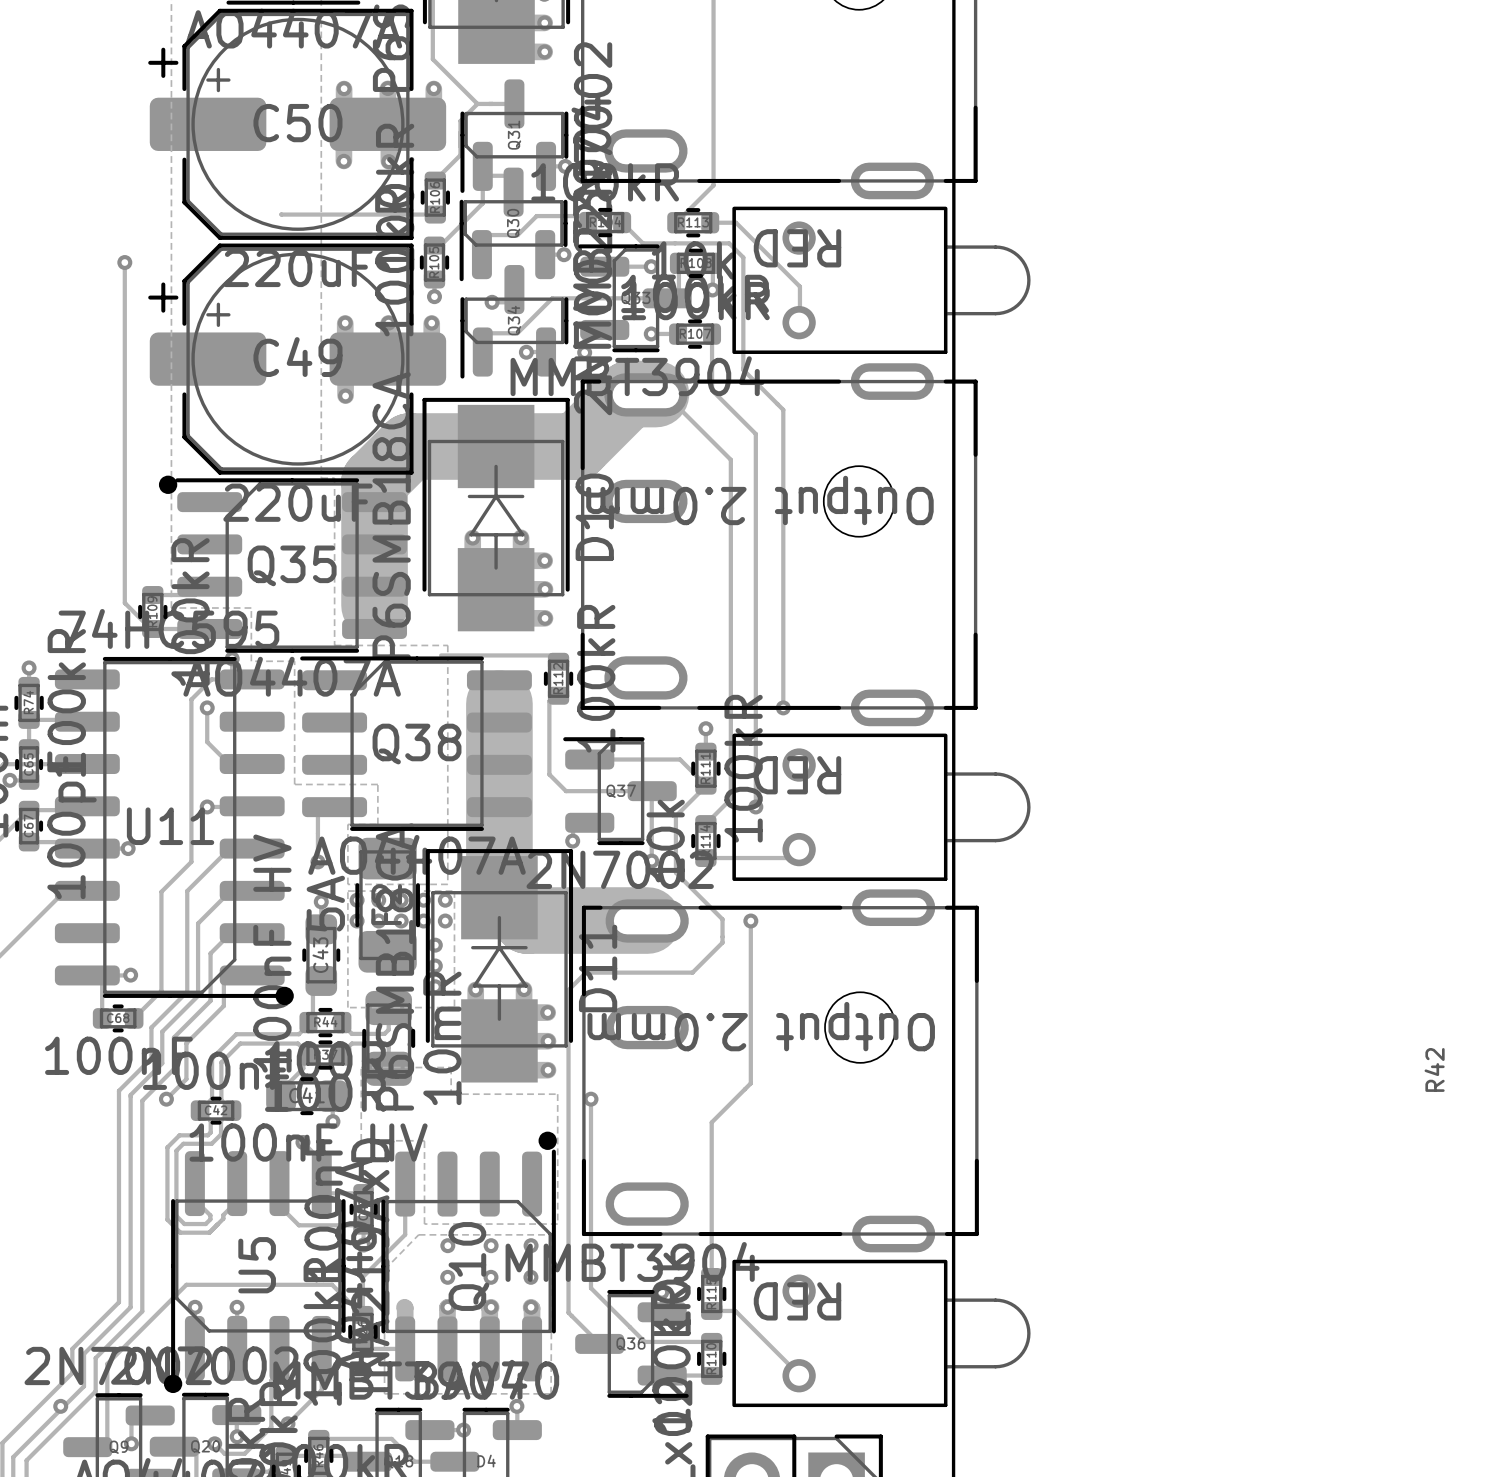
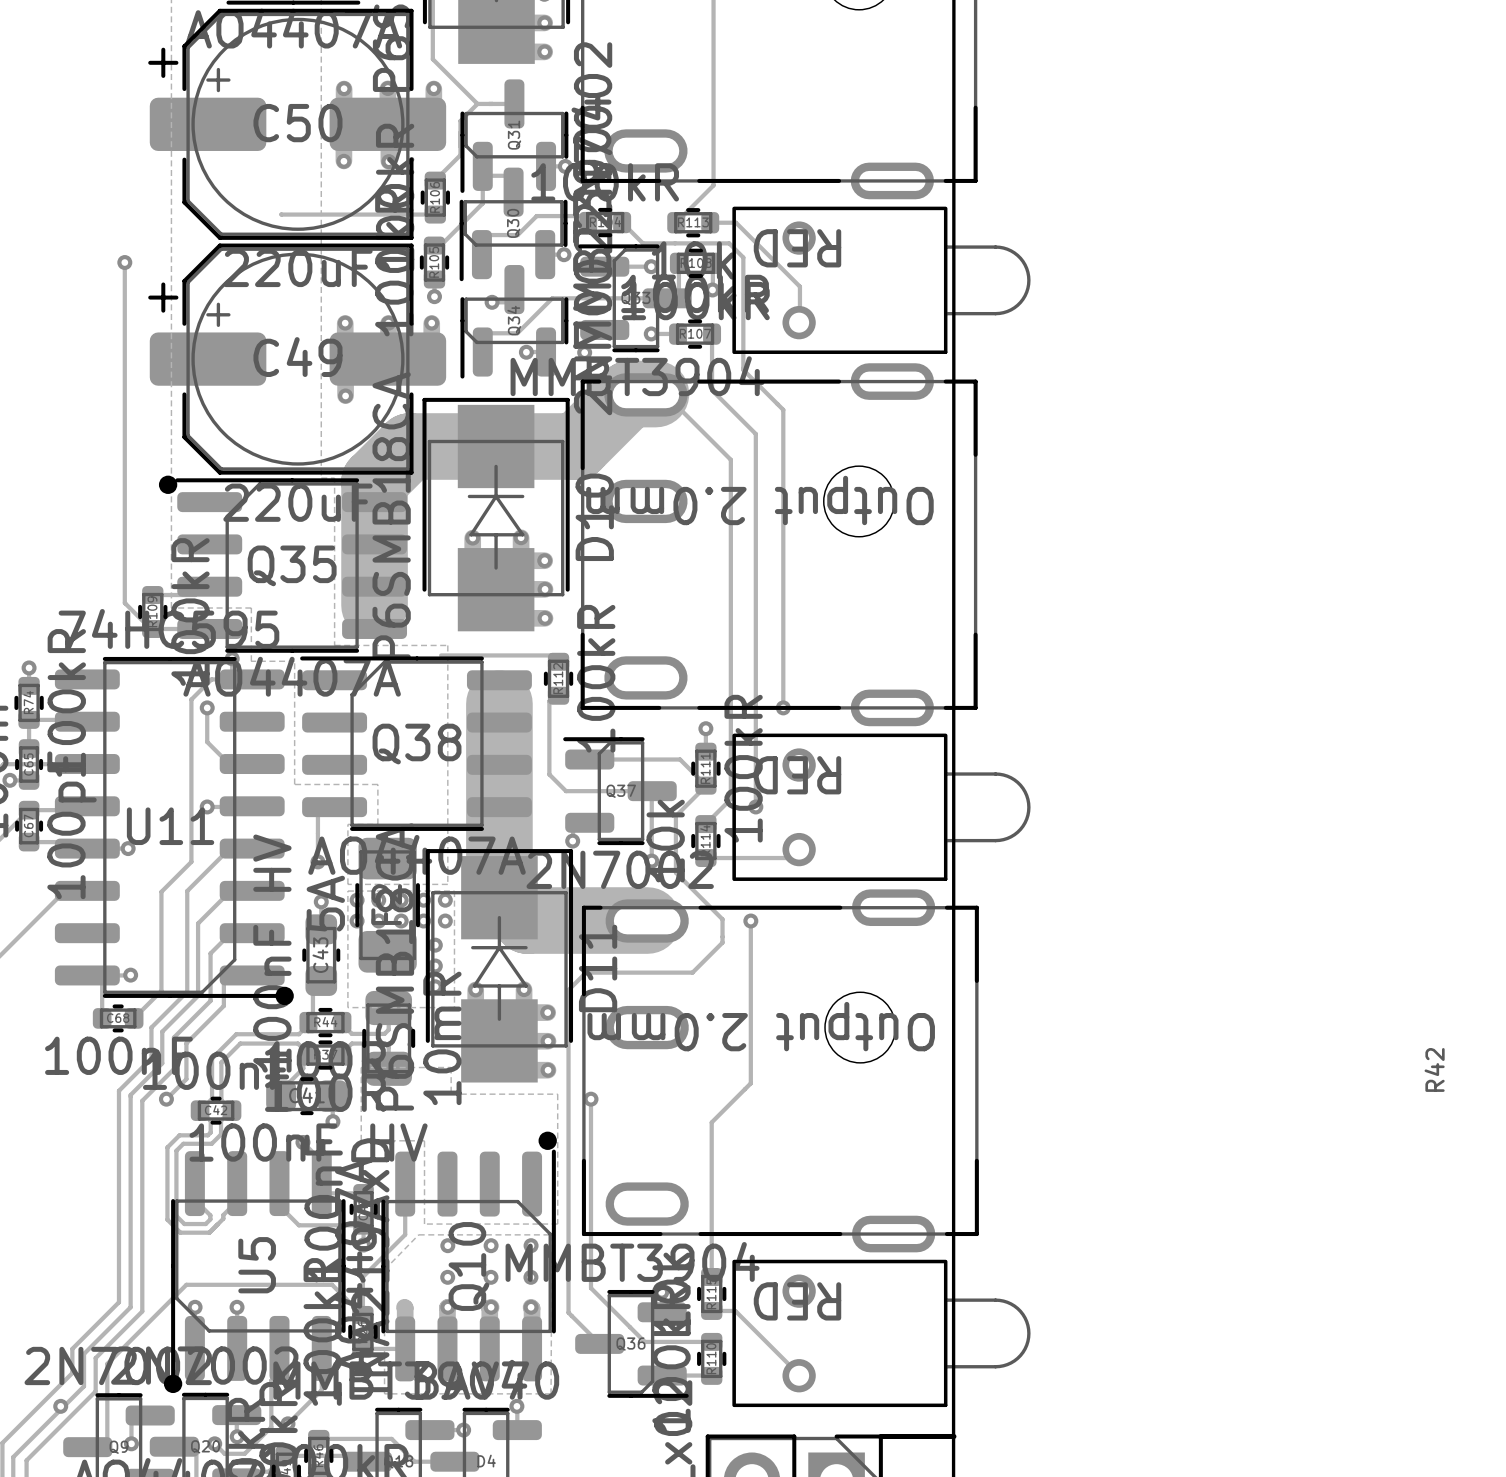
line: none -> (880, 1436) (953, 1436)

